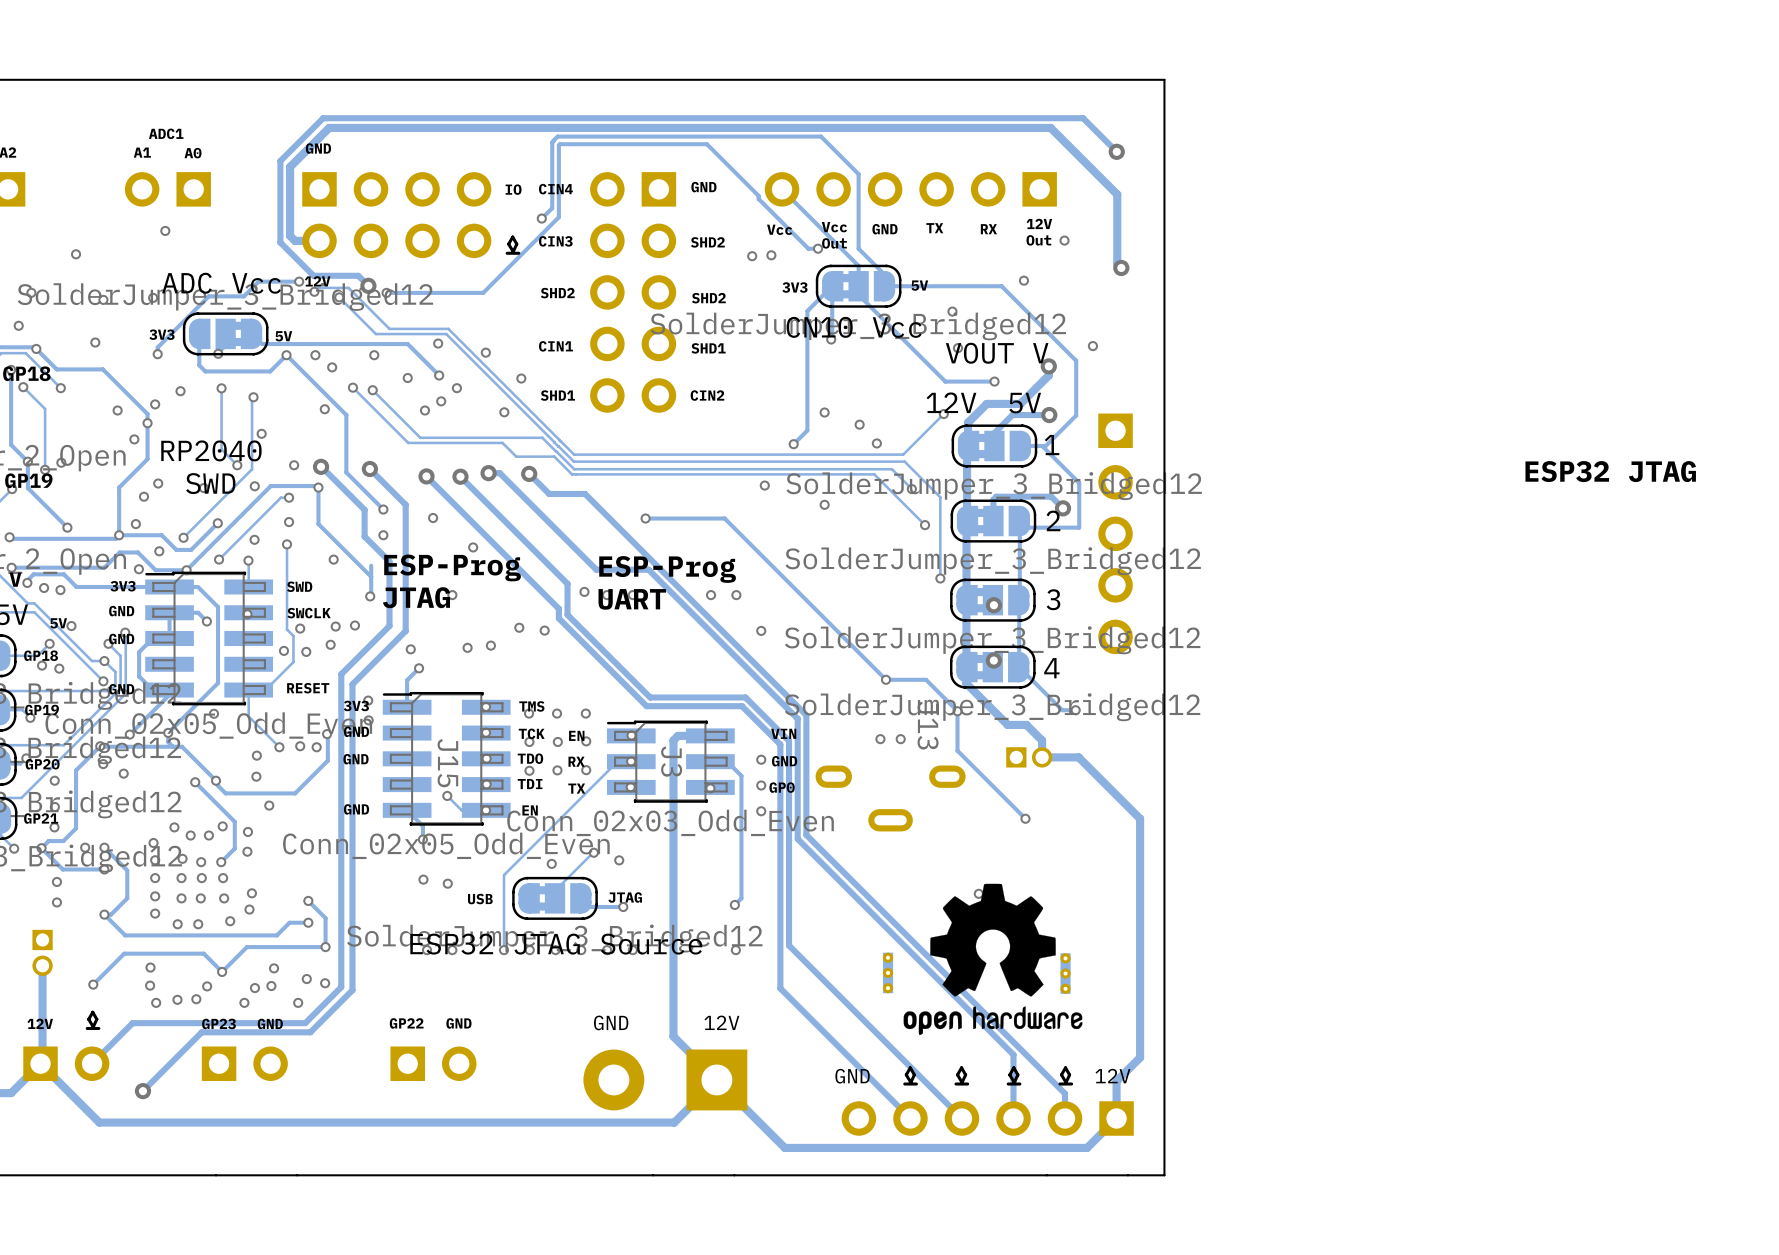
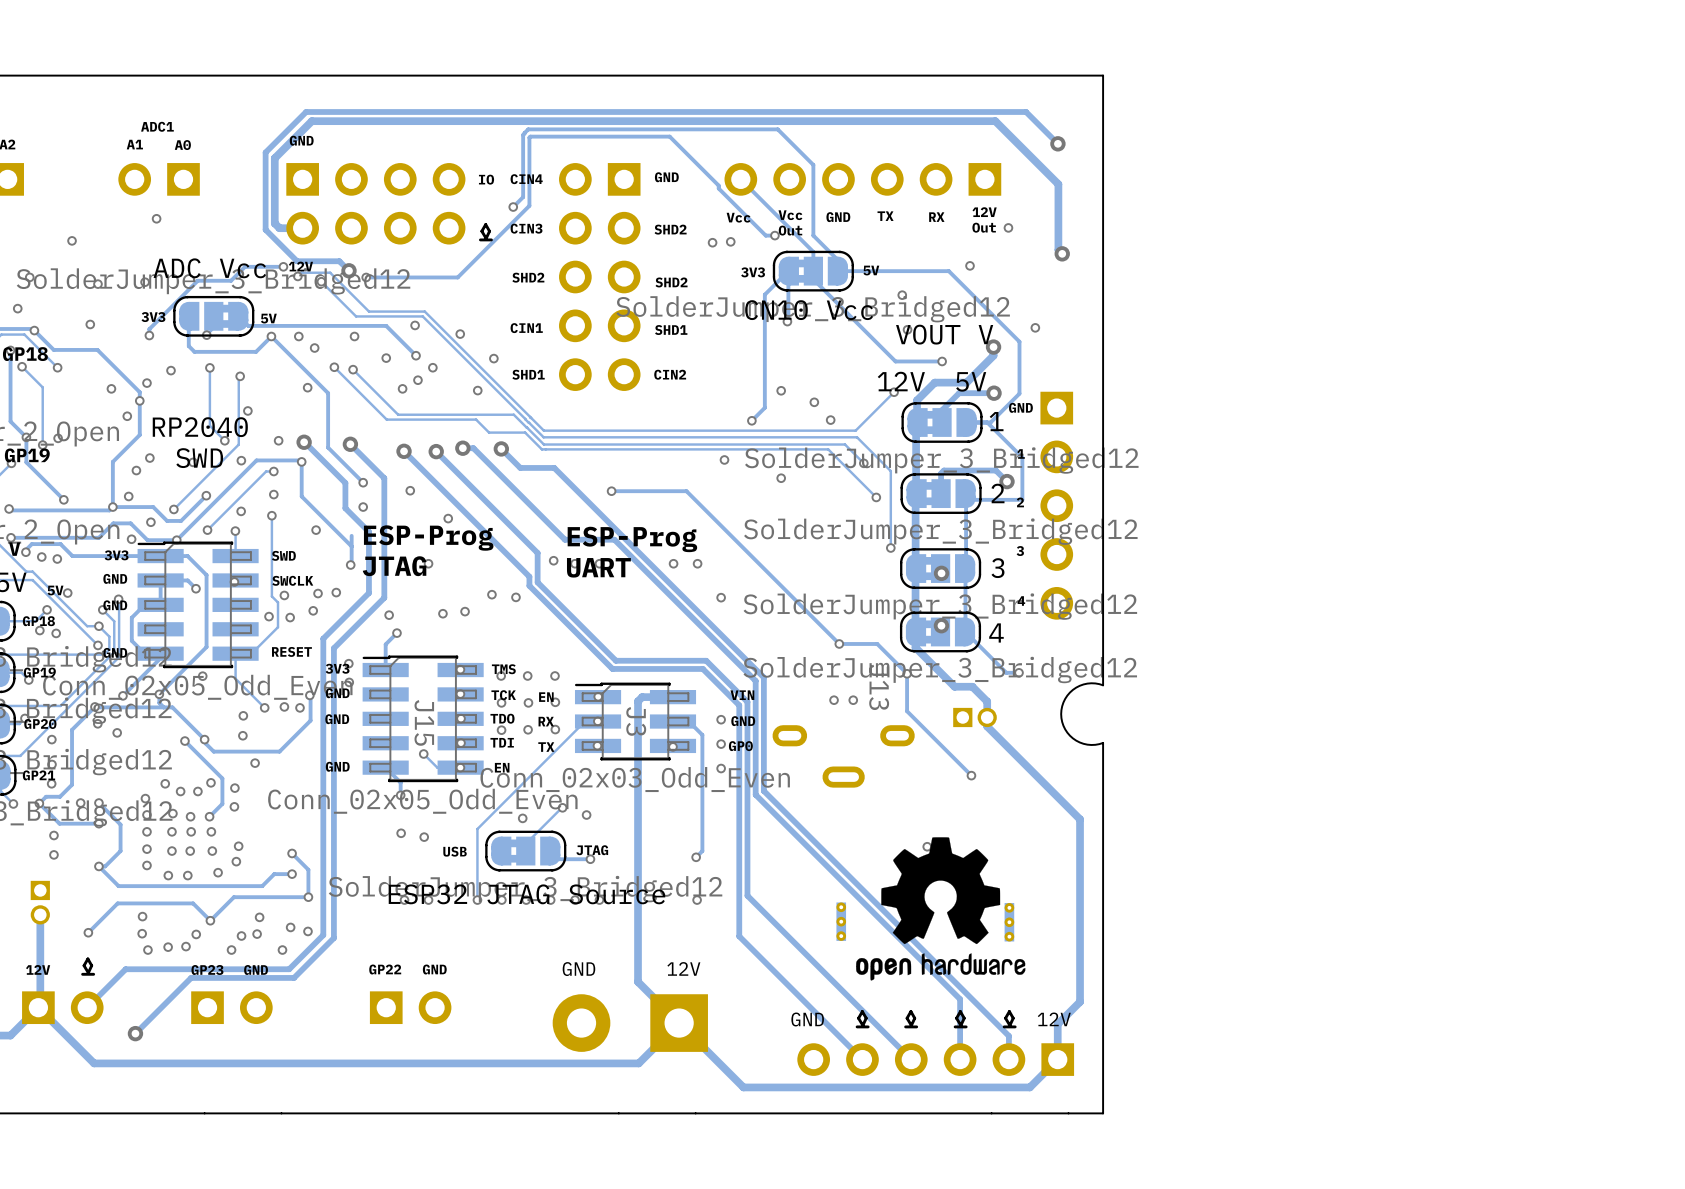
text: none -> GND (1020, 407)
text: ESP32 JTAG (1610, 471) -> none
text: none -> 1 (1021, 453)
text: none -> 2 (1020, 502)
text: none -> 3 (1020, 551)
text: none -> 4 (1021, 601)
board edge: (1164, 723) (1164, 784) -> (1103, 685) (1087, 683) (1072, 689) (1065, 698) (1061, 714) (1065, 729) (1076, 740) (1091, 744) (1103, 742)
track: (1042, 757) (1078, 757) (1140, 818) (1140, 864) -> (987, 717) (987, 726) (1080, 819)

